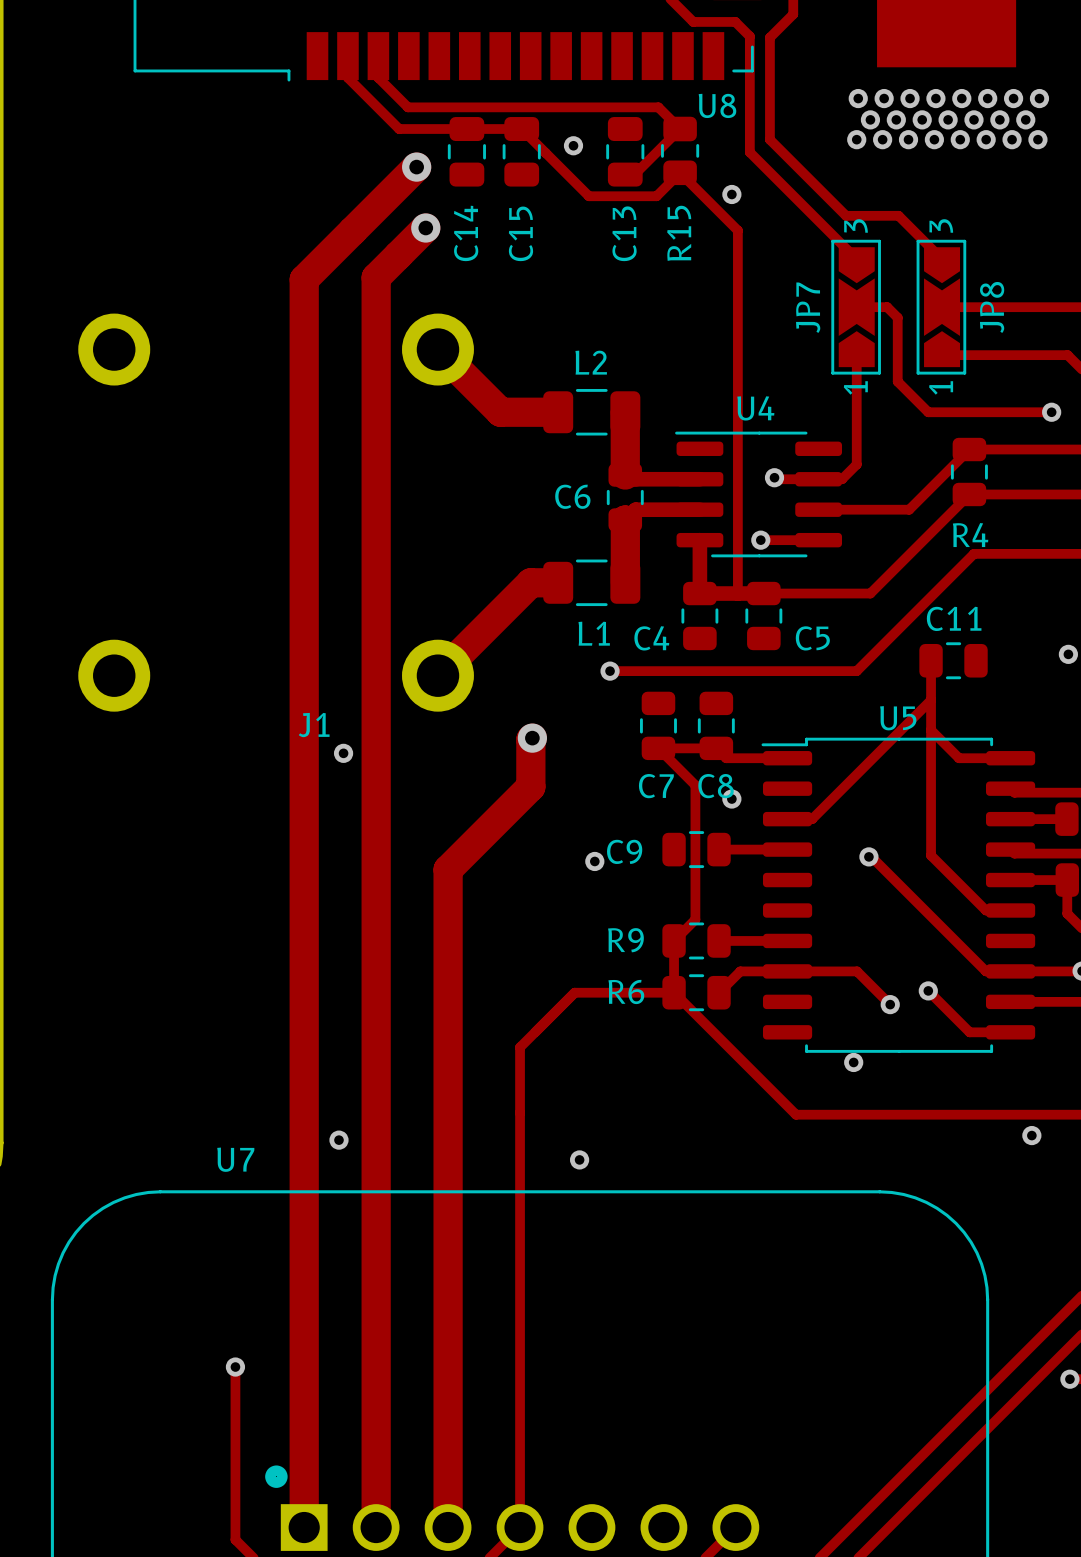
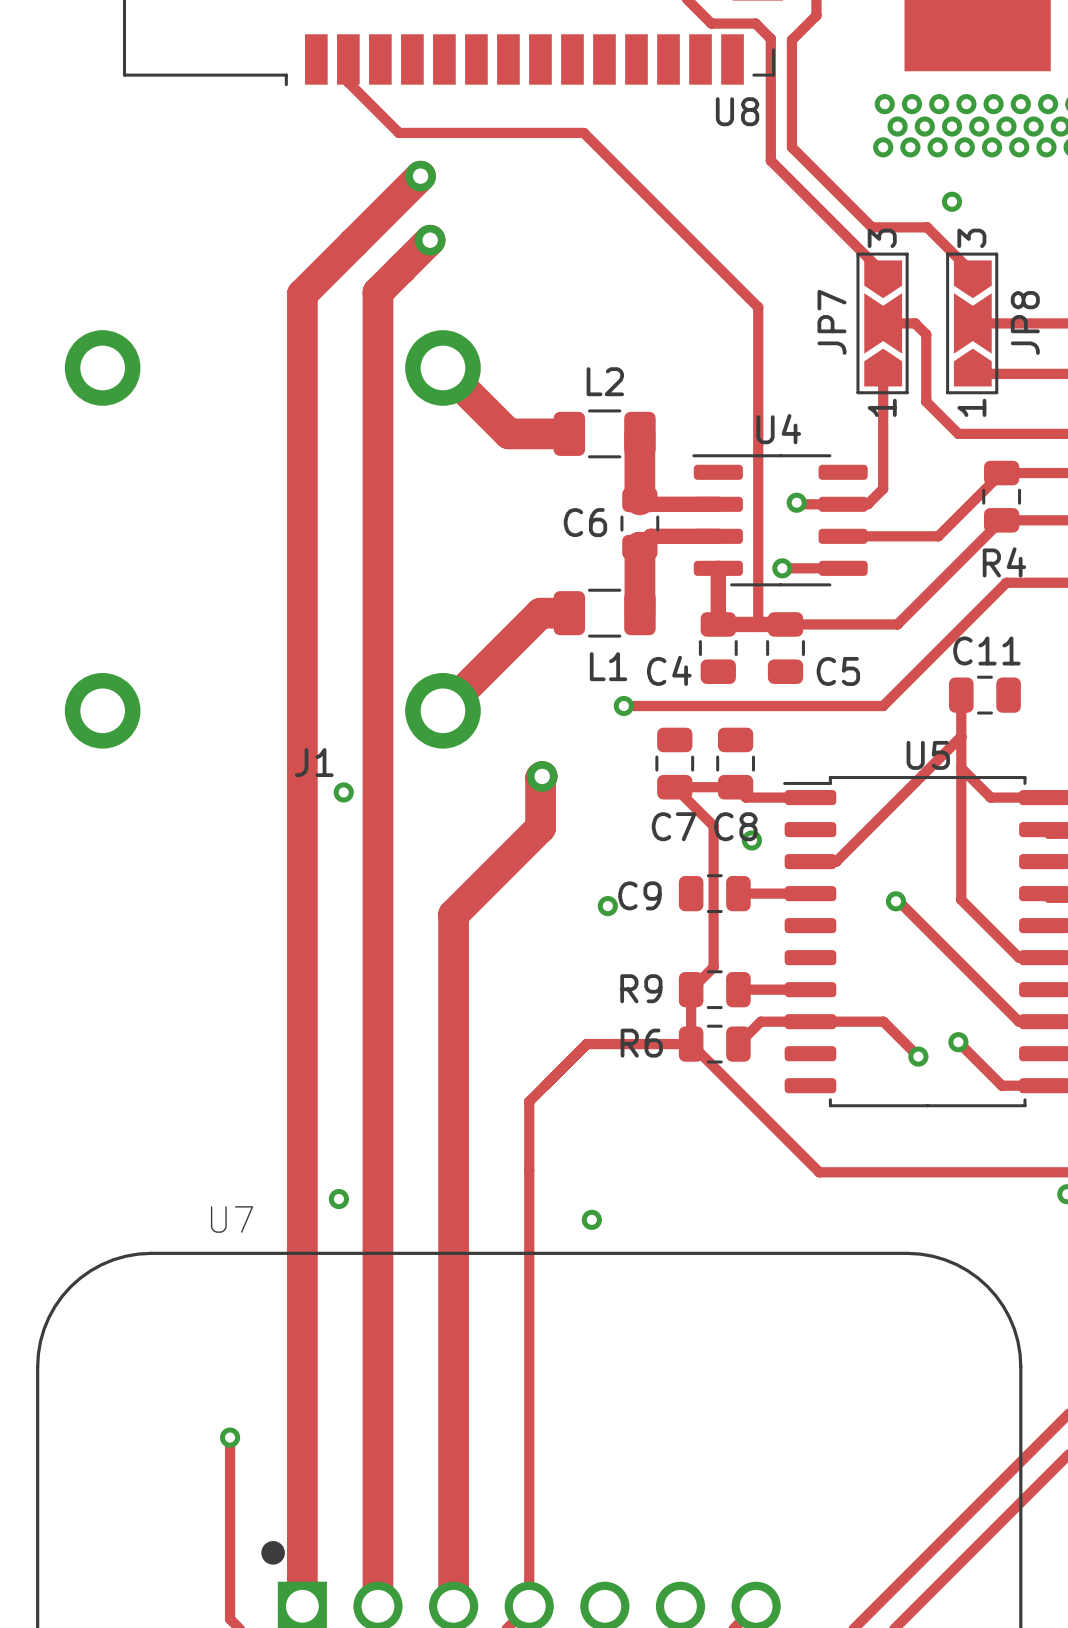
track: (378, 56) (378, 77) (407, 107) (658, 107) (680, 129) (634, 174) (625, 174) -> none
track: (396, 125) (399, 129) (521, 129) (588, 196) (656, 196) (680, 172) (737, 230) (737, 291) -> (398, 132) (583, 132) (758, 307)
via: (573, 145) -> none
R15: (680, 150) -> none
C14: (466, 151) -> none
C15: (521, 151) -> none
C13: (625, 151) -> none
via: none -> (952, 201)
via: (731, 194) -> none
via: (853, 1062) -> none

